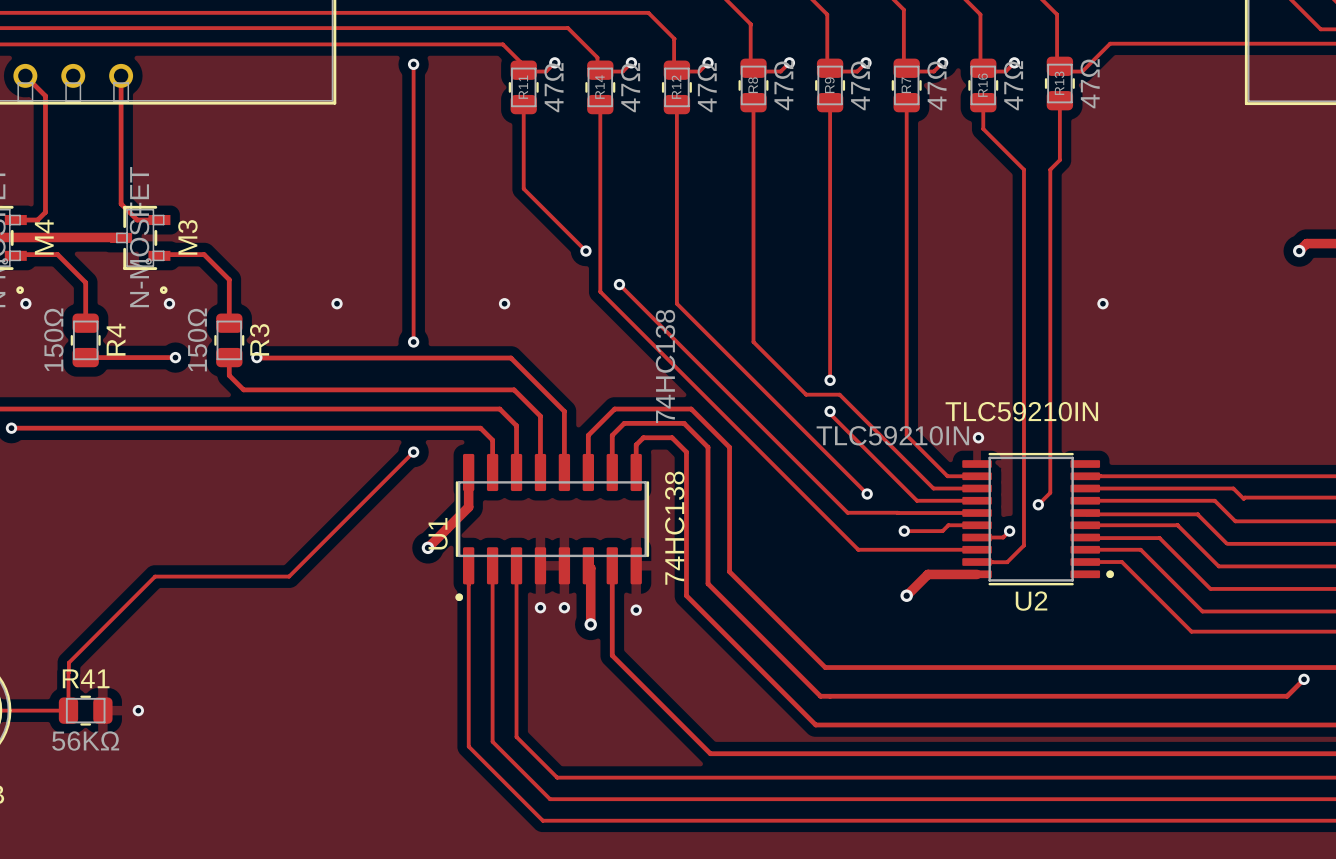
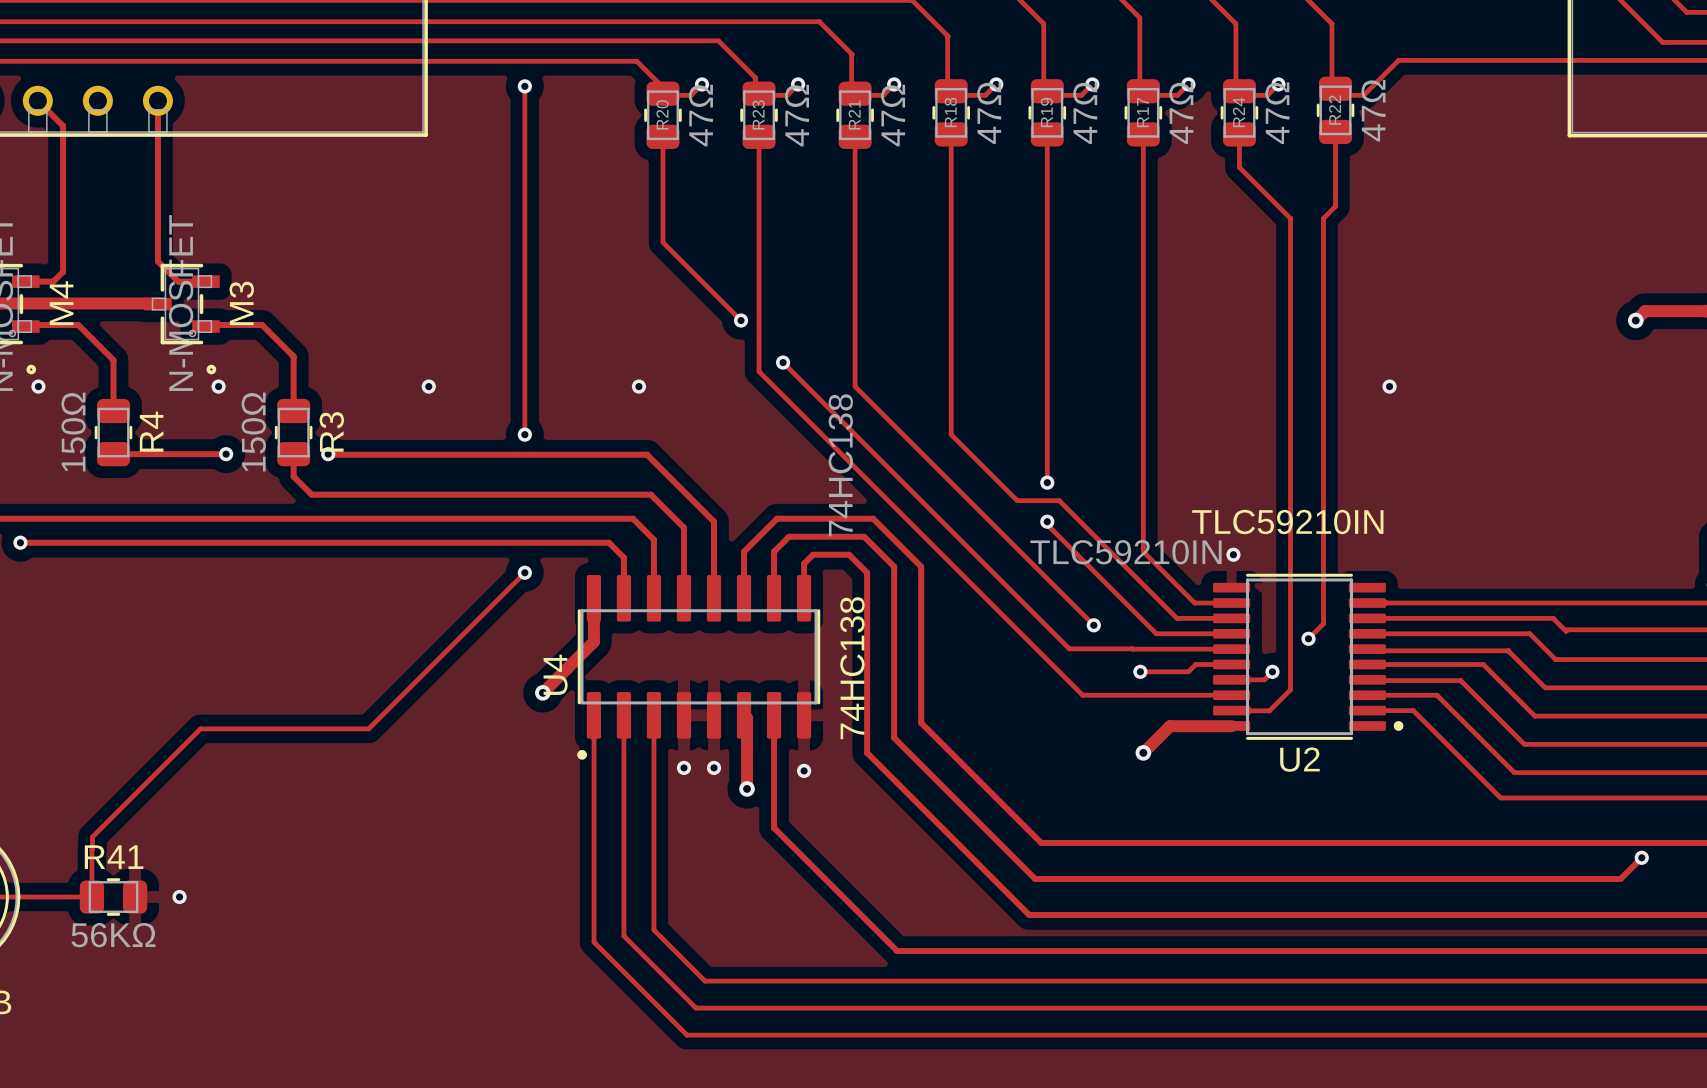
R13 name: R13 (1059, 83) -> R22 (1334, 110)
R8 name: R8 (753, 85) -> R18 (950, 112)
R9 name: R9 (829, 85) -> R19 (1046, 112)
R7 name: R7 (906, 85) -> R17 (1142, 112)
R16 name: R16 (982, 85) -> R24 (1238, 112)
R11 name: R11 (523, 87) -> R20 (662, 114)
R14 name: R14 (599, 87) -> R23 (758, 114)
R12 name: R12 (676, 87) -> R21 (854, 114)
U1 name: U1 (438, 533) -> U4 (555, 674)

